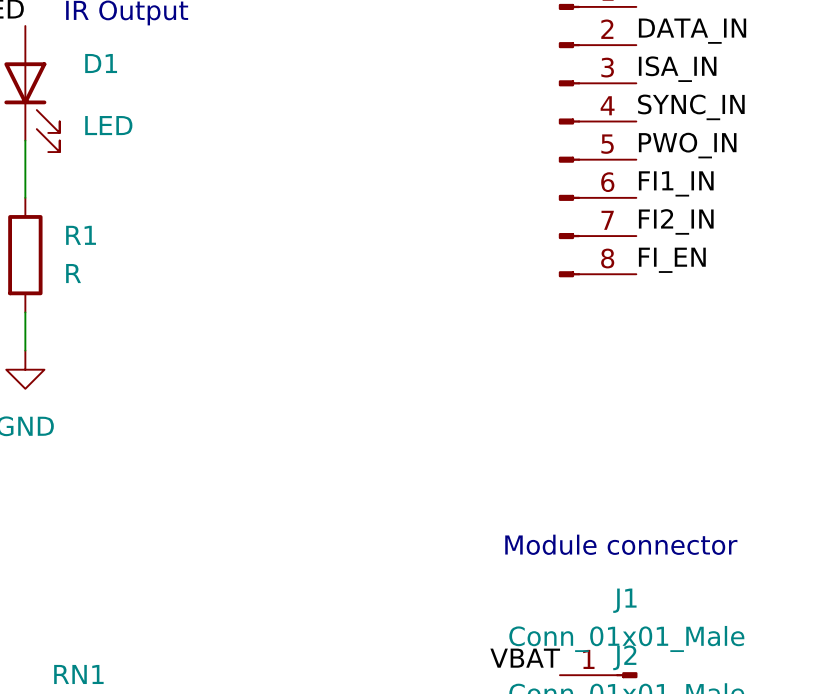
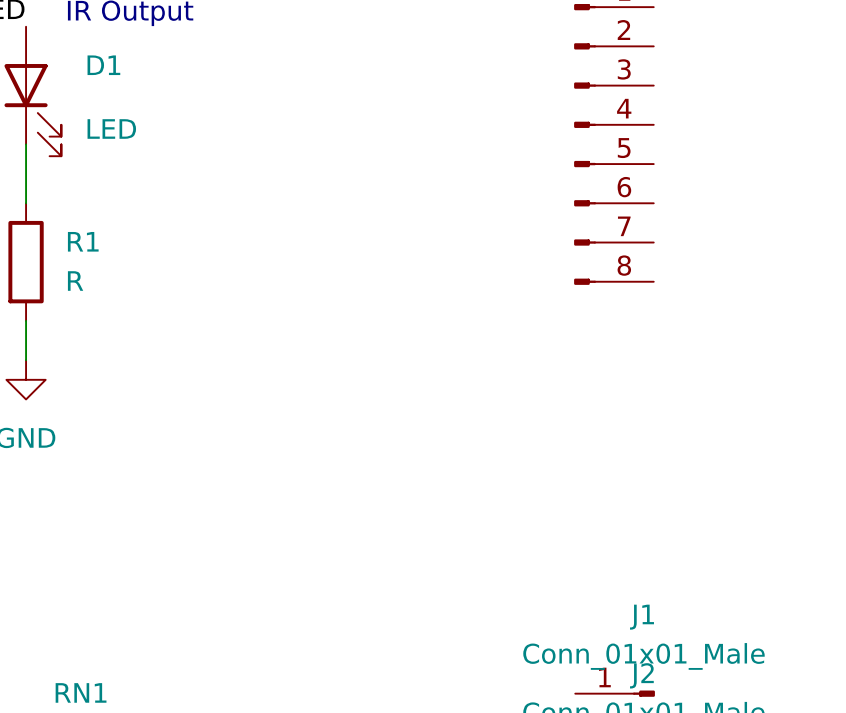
label: DATA_IN (692, 31) -> none
label: ISA_IN (677, 69) -> none
label: SYNC_IN (691, 107) -> none
label: PWO_IN (687, 145) -> none
label: FI1_IN (676, 183) -> none
label: FI2_IN (676, 221) -> none
label: FI_EN (672, 260) -> none
text: Module connector (621, 544) -> none
label: VBAT (525, 658) -> none

